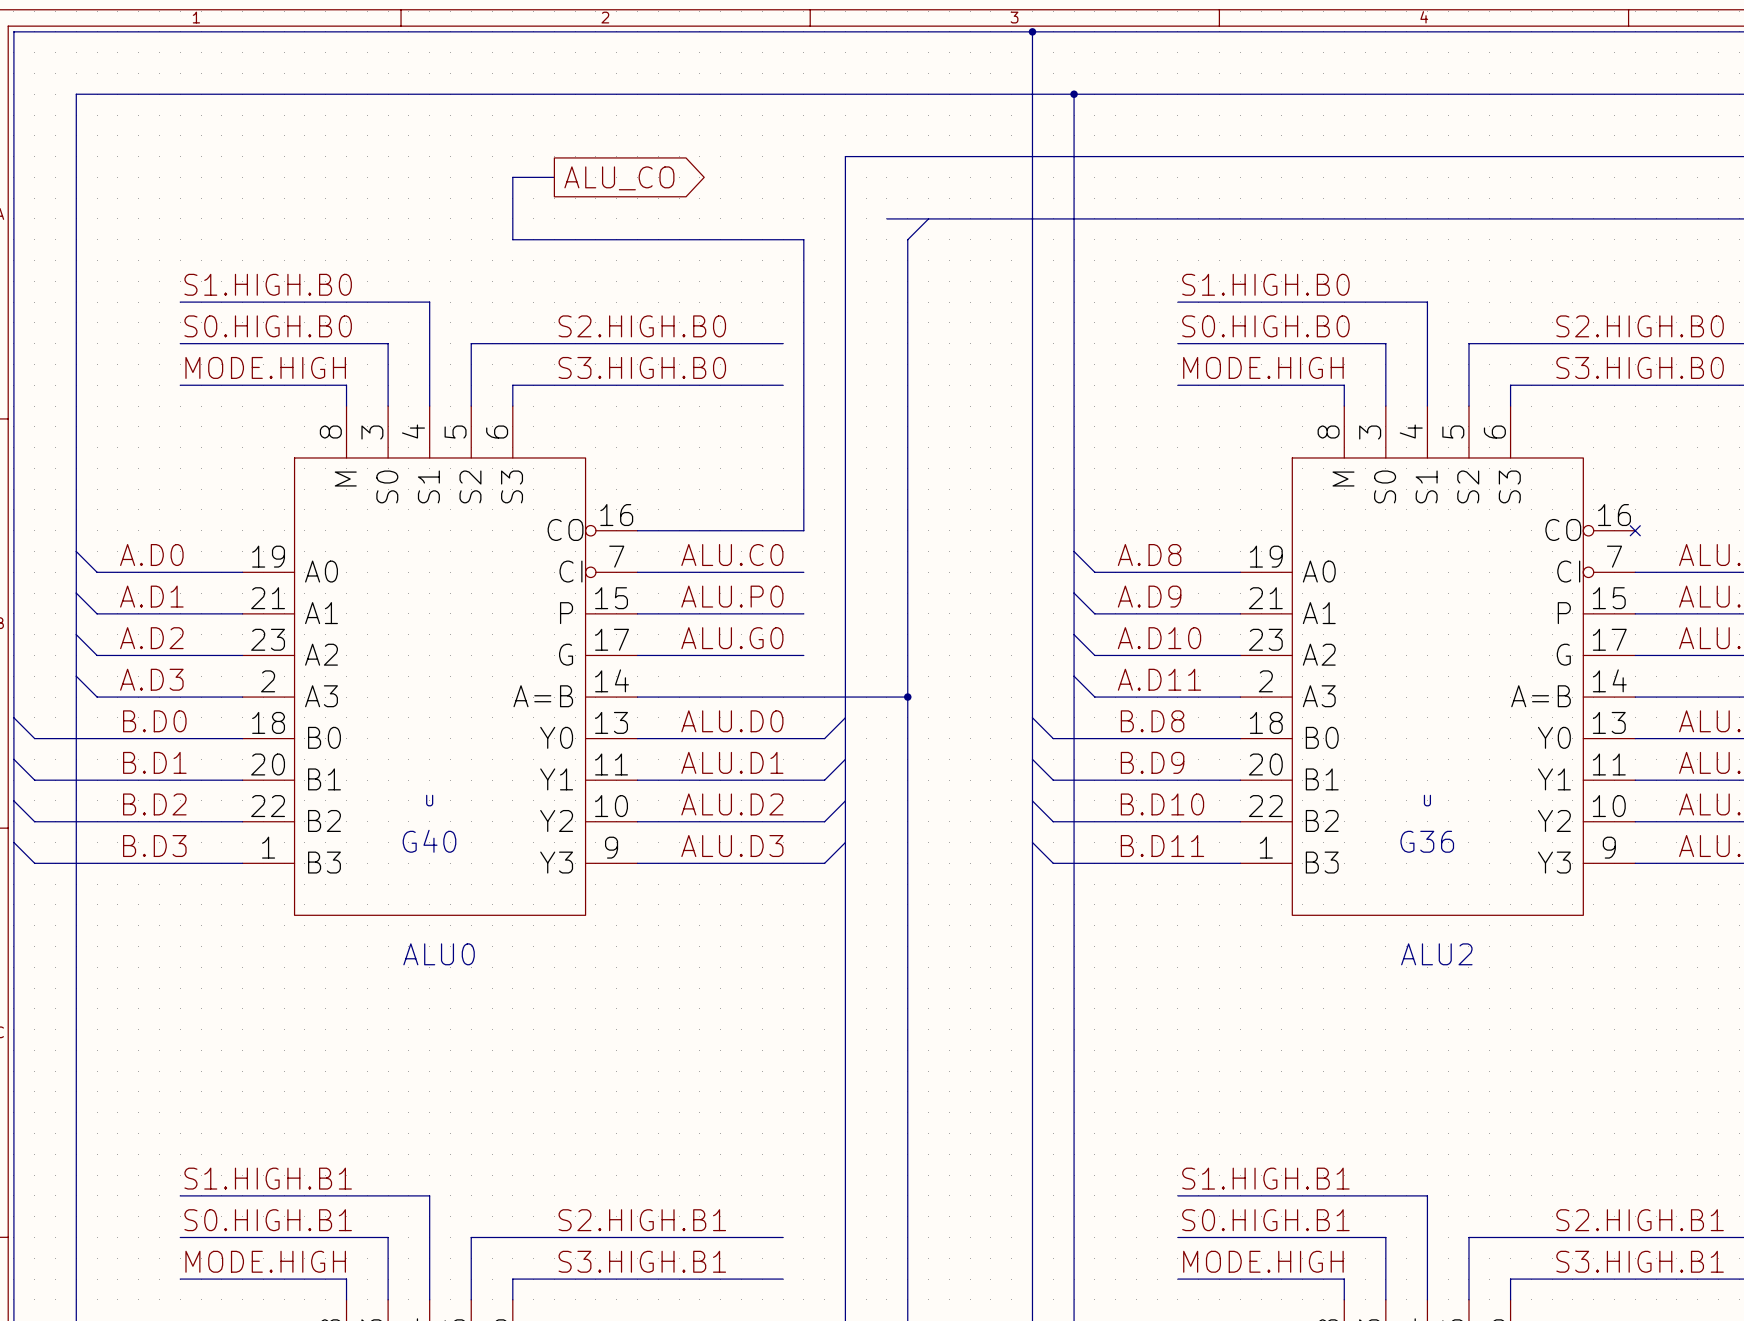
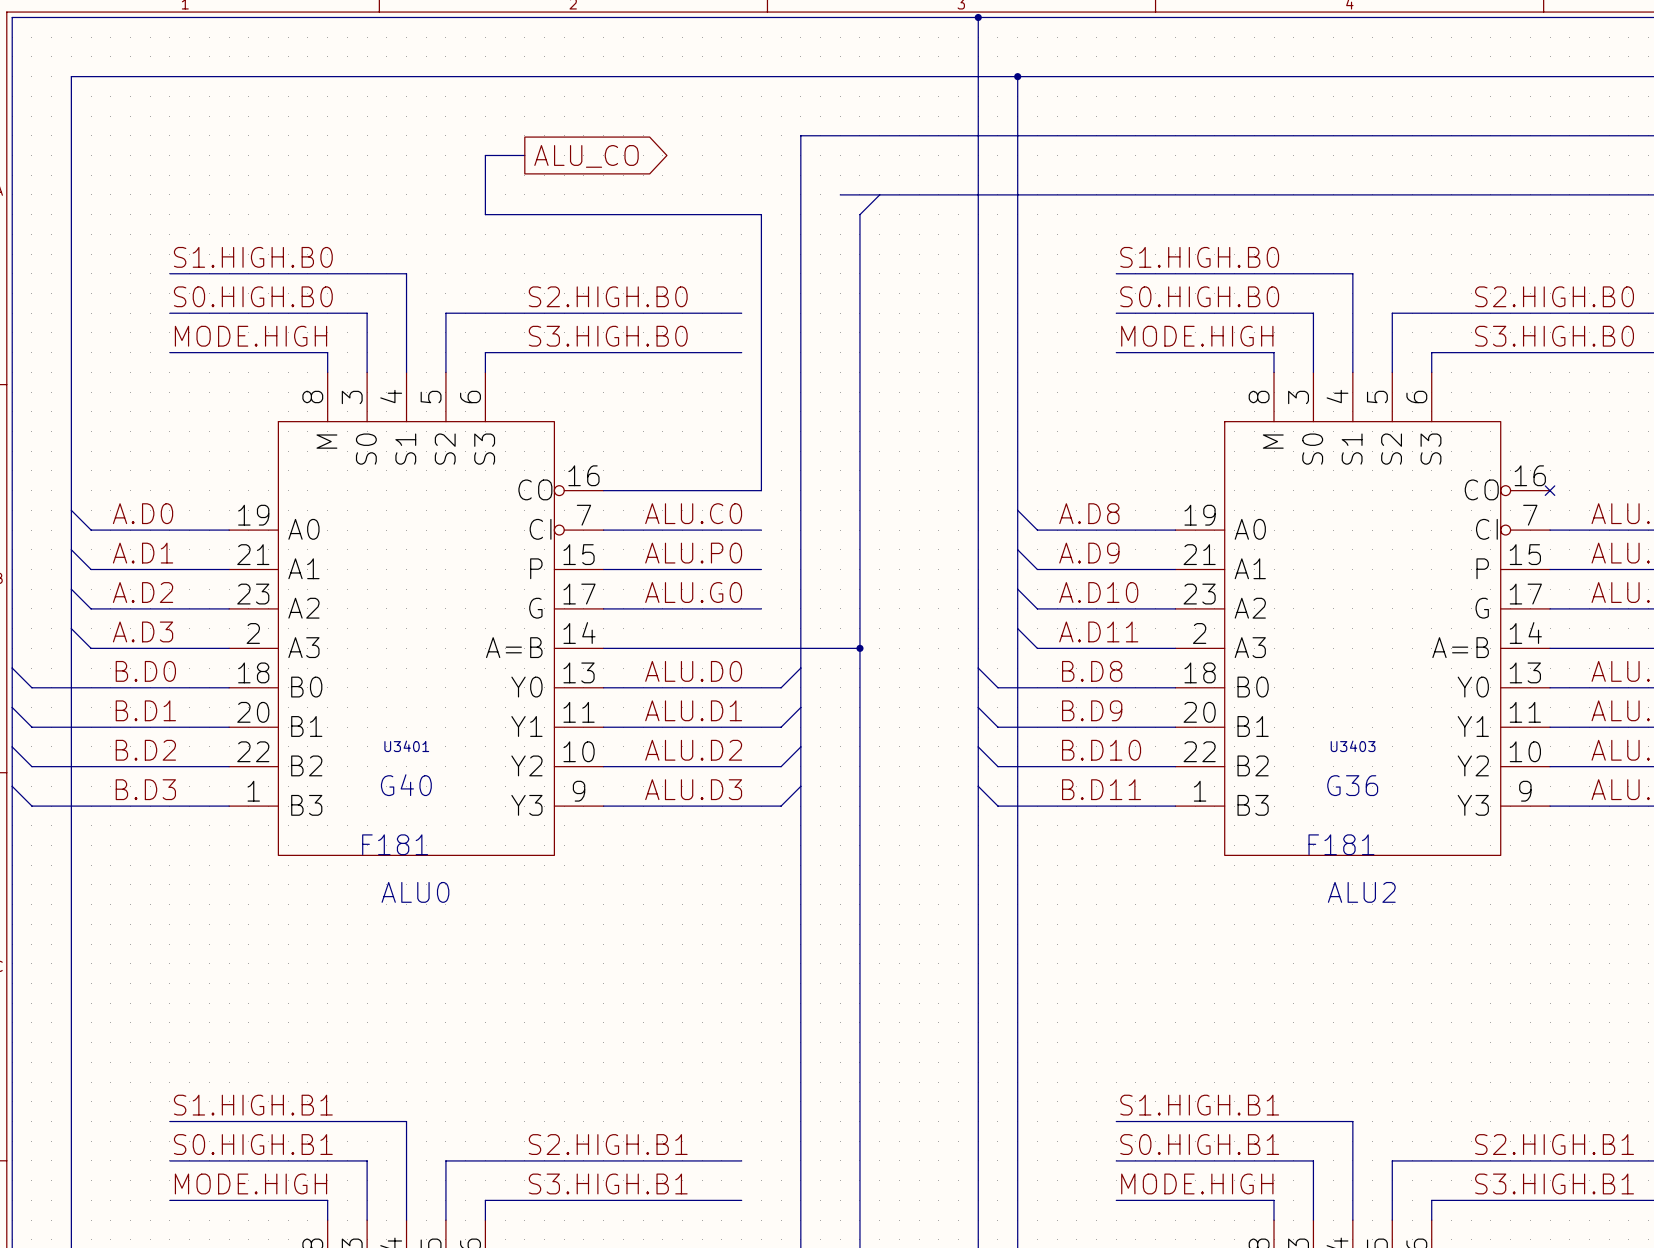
U name: U (429, 800) -> U3401 (406, 746)
U name: U (1427, 800) -> U3403 (1353, 746)
U value: none -> F181 (395, 844)
U value: none -> F181 (1341, 844)

